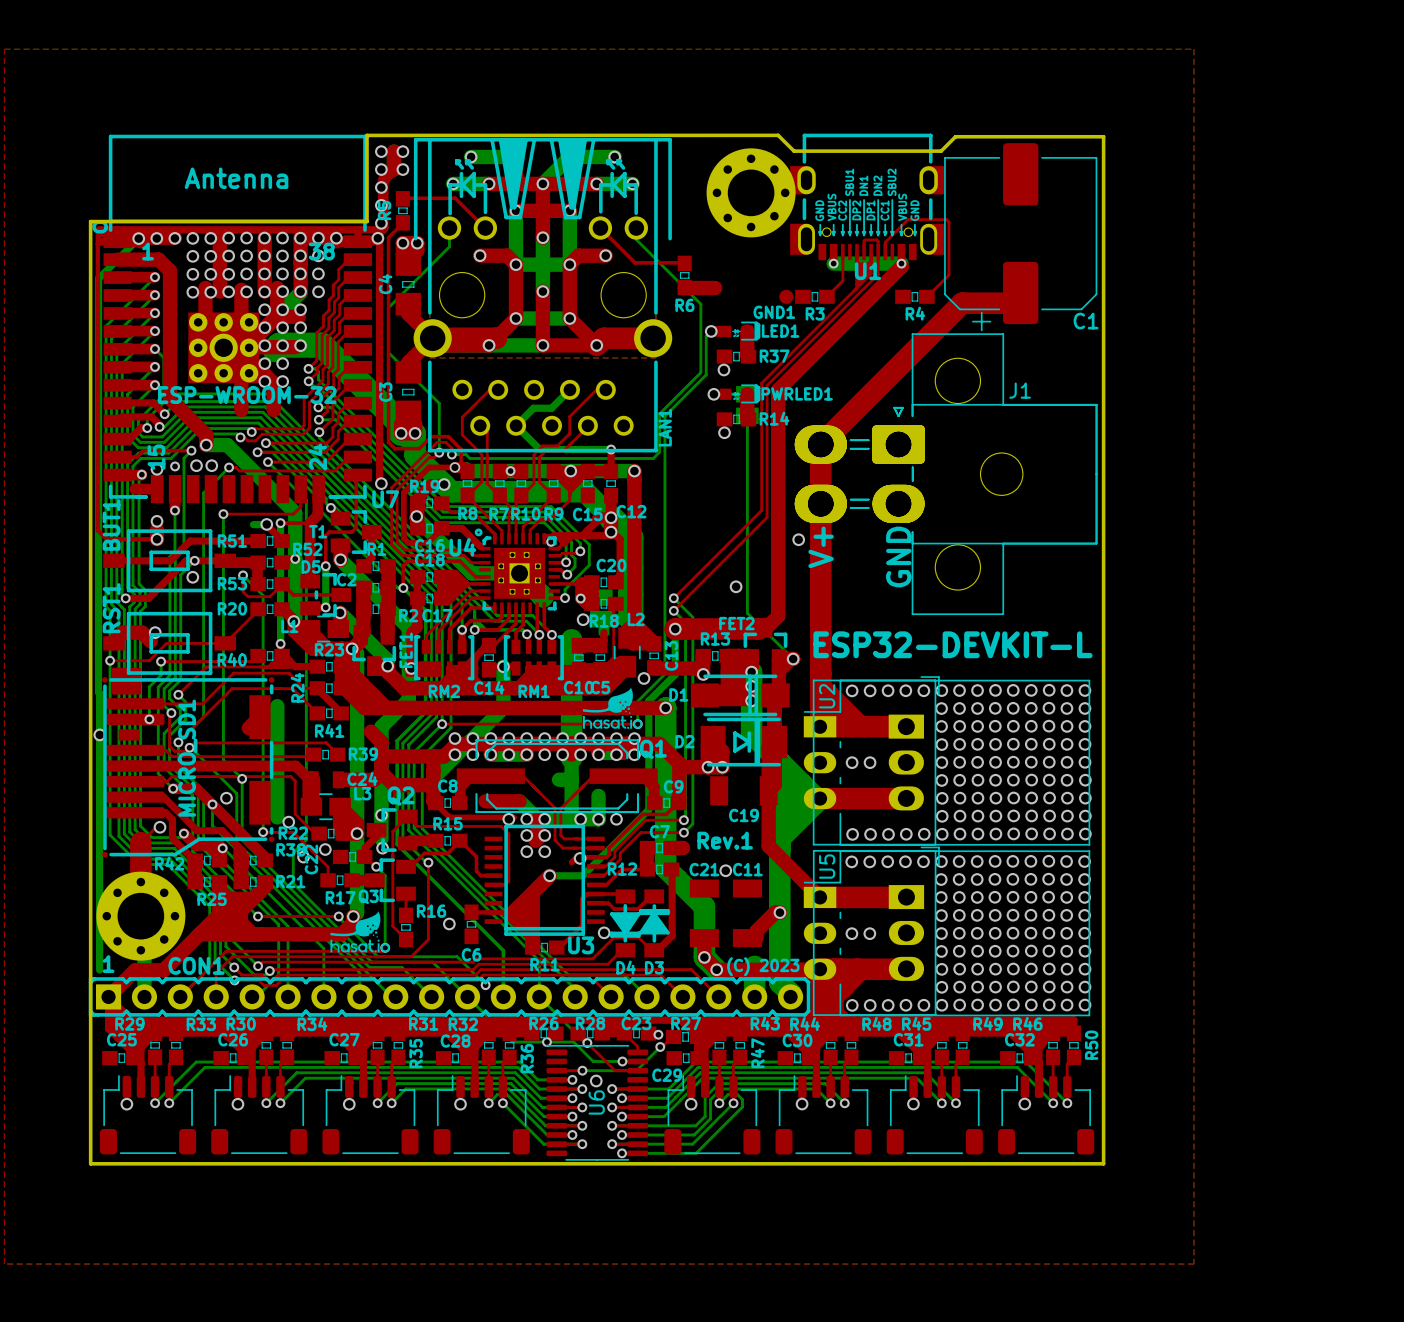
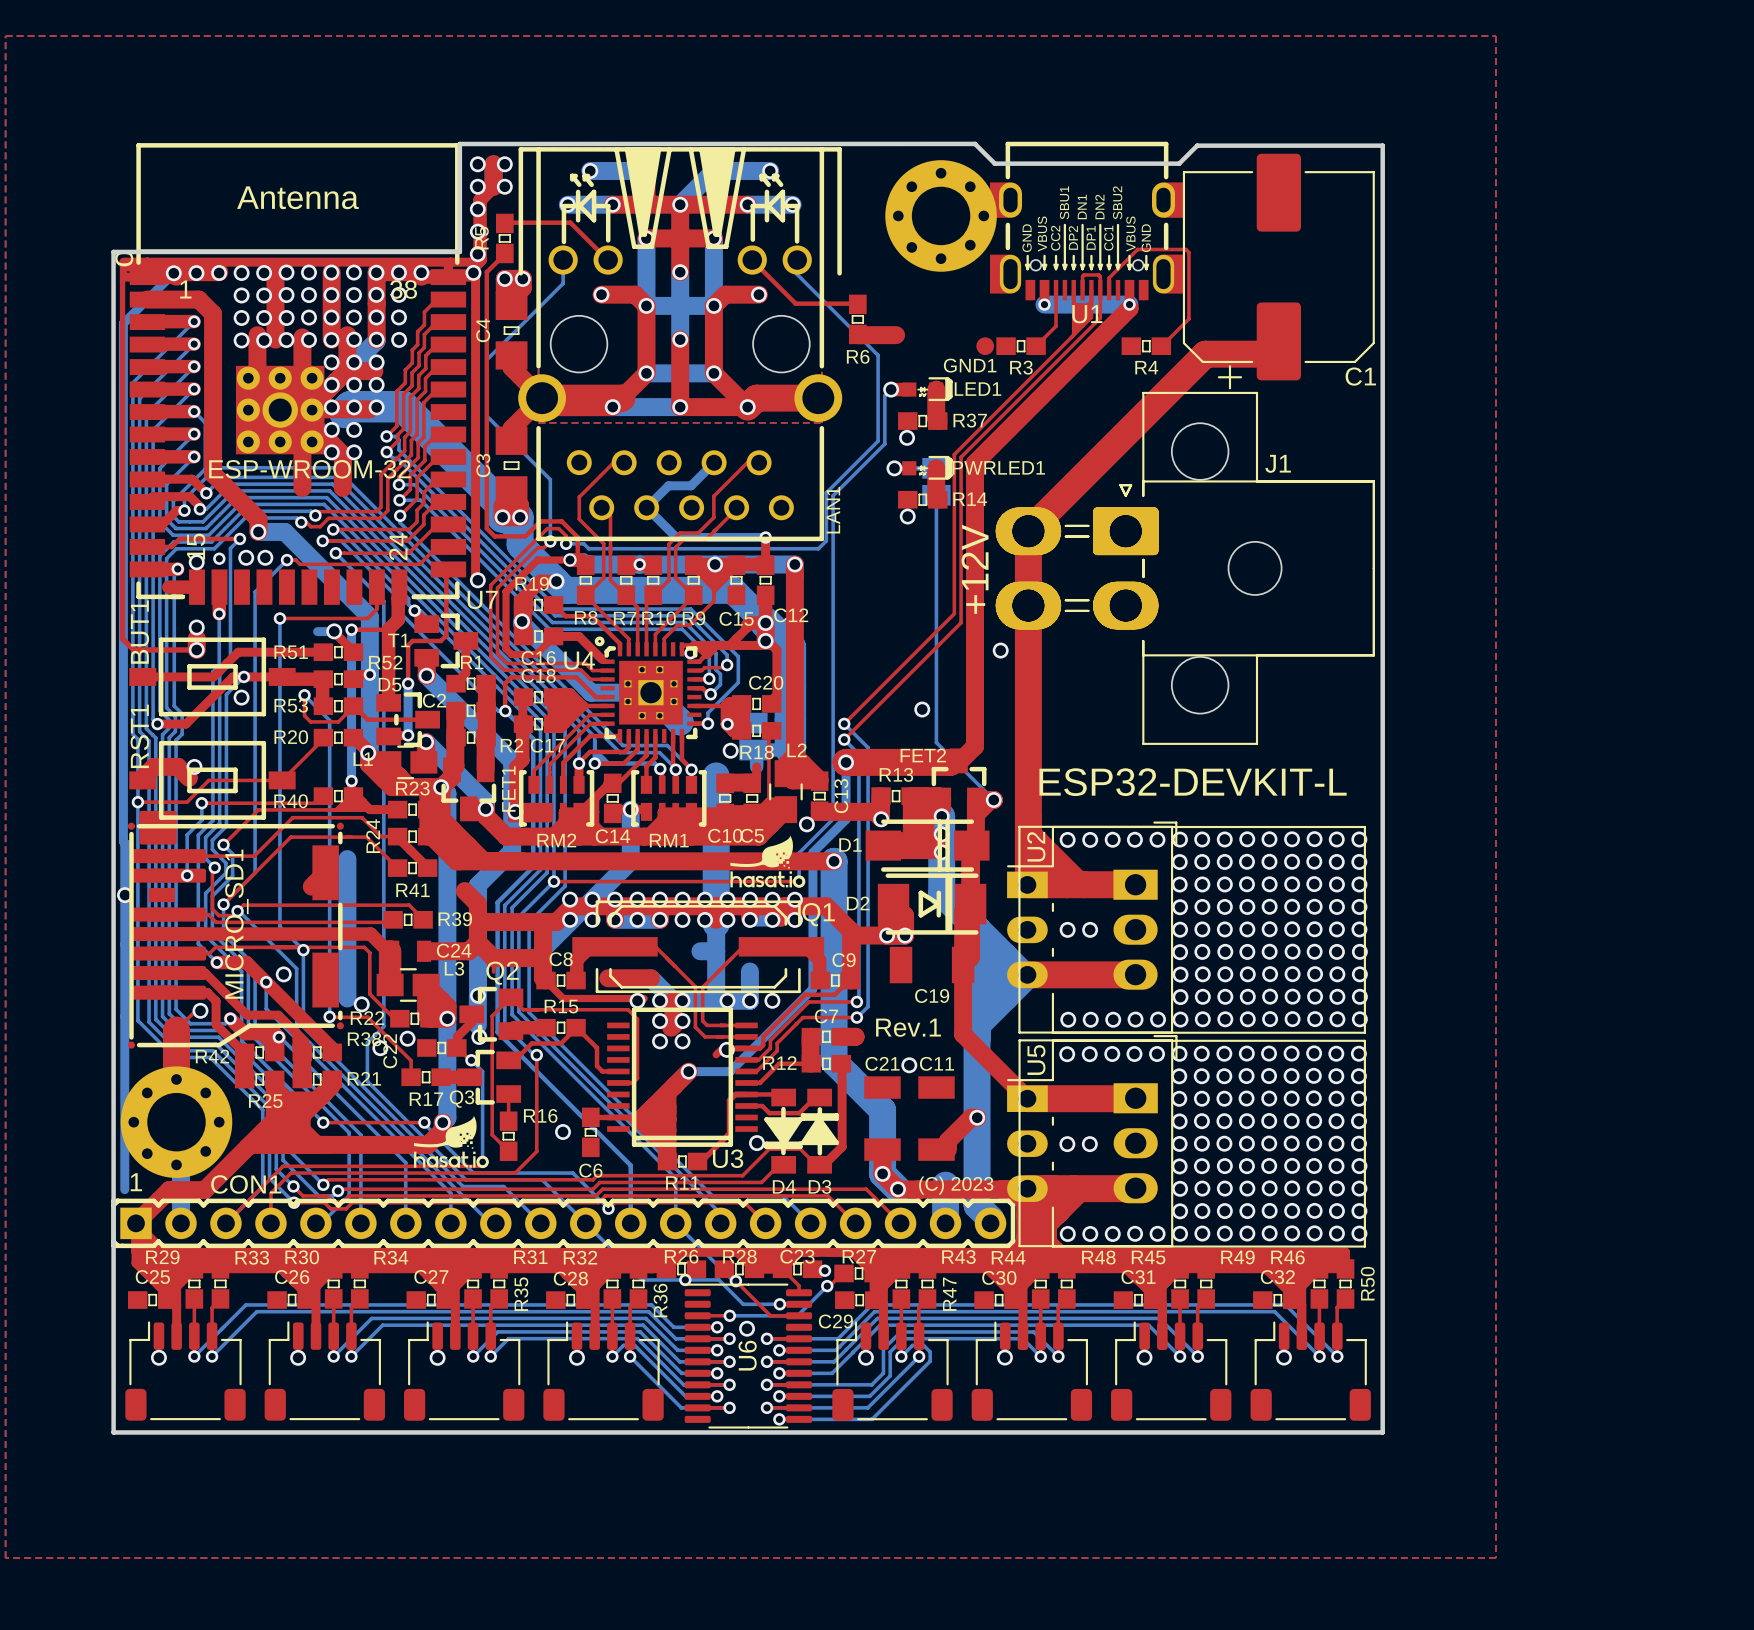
text: none -> +12V (975, 569)
text: V+ (821, 547) -> none
text: GND (898, 556) -> none

